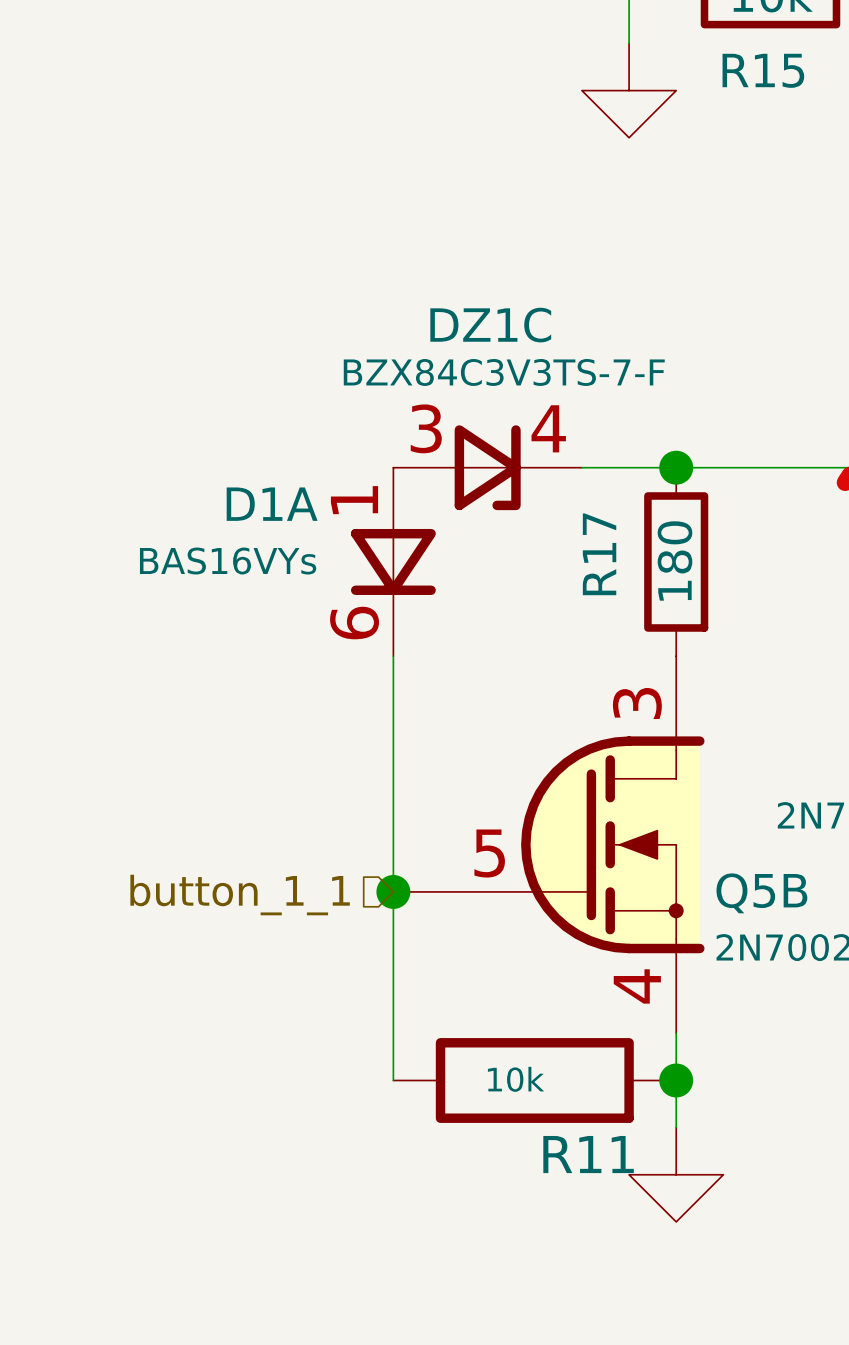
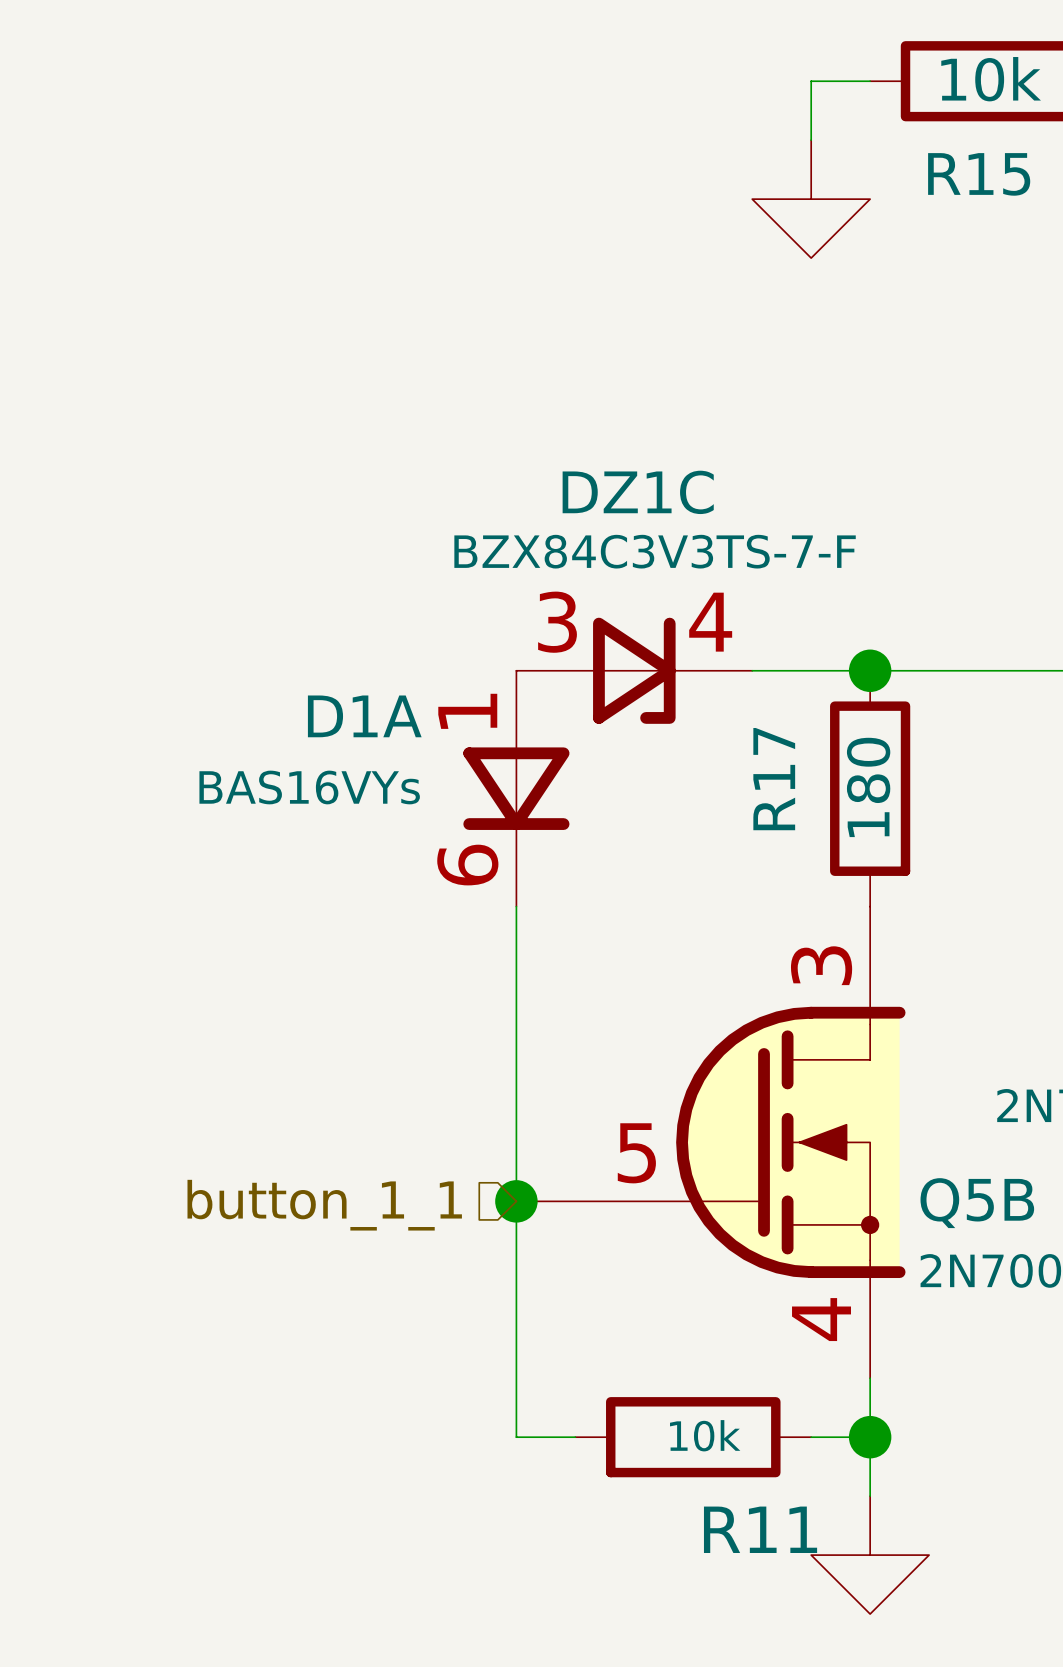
R11 symbol: [393, 1038, 677, 1123] -> [575, 1397, 812, 1478]

